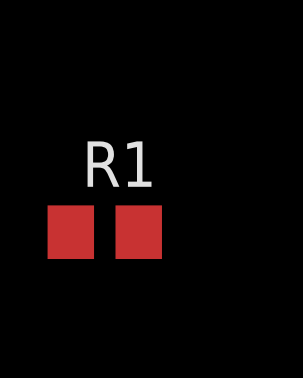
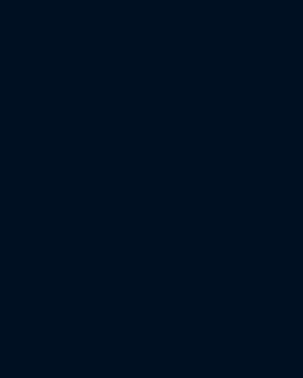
R1: (104, 232) -> none

